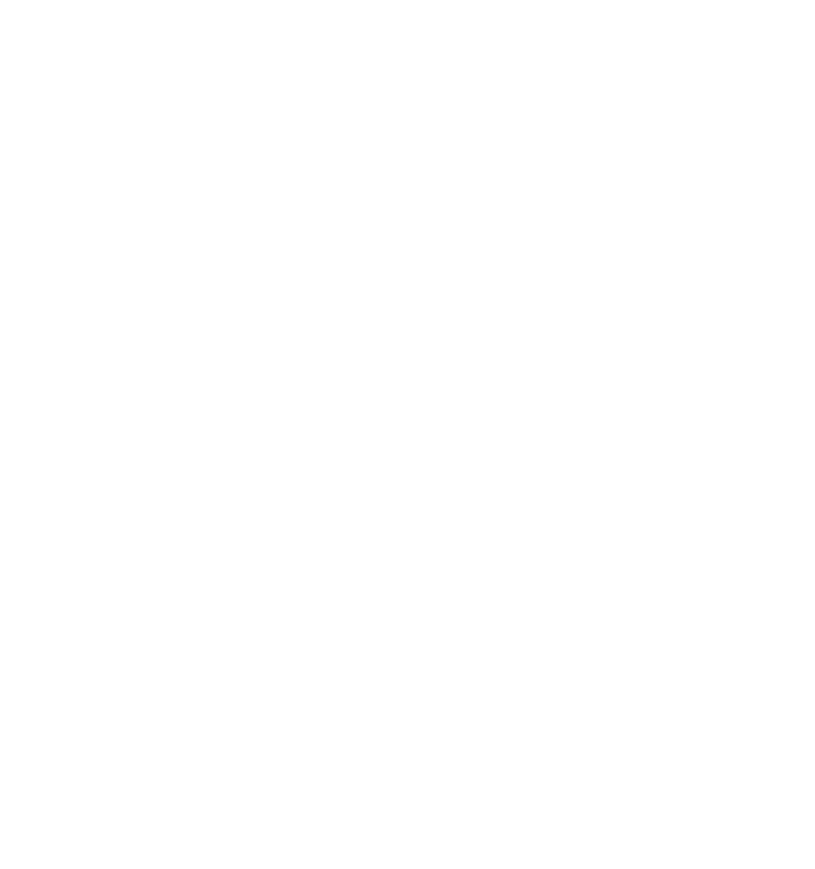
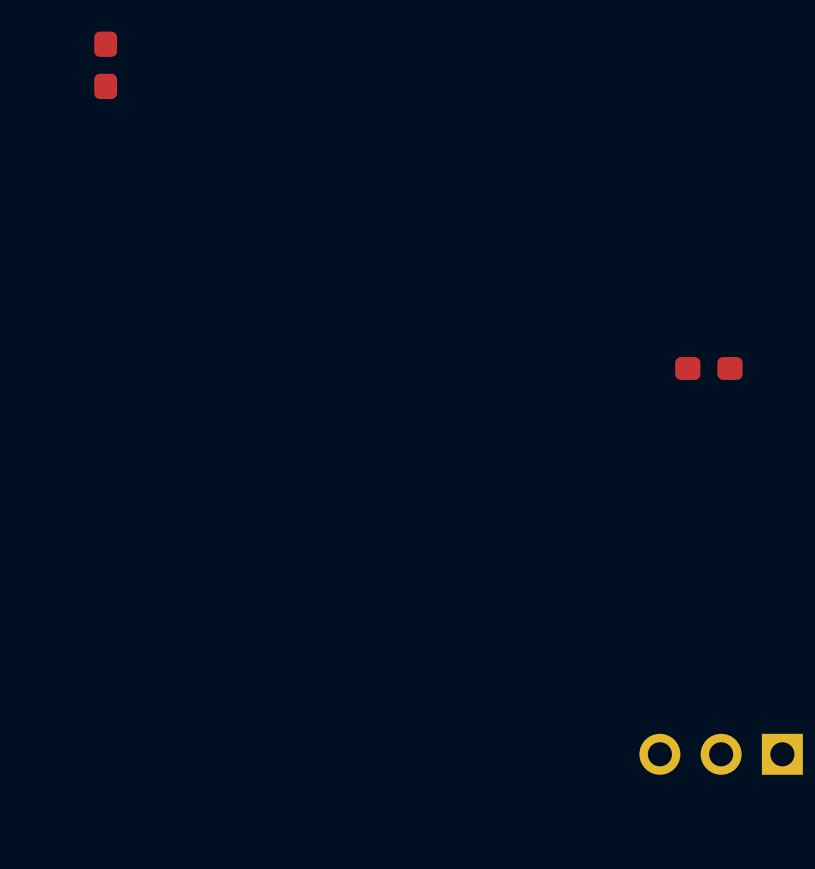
part: none -> (105, 65)
part: none -> (708, 368)
part: none -> (721, 754)

